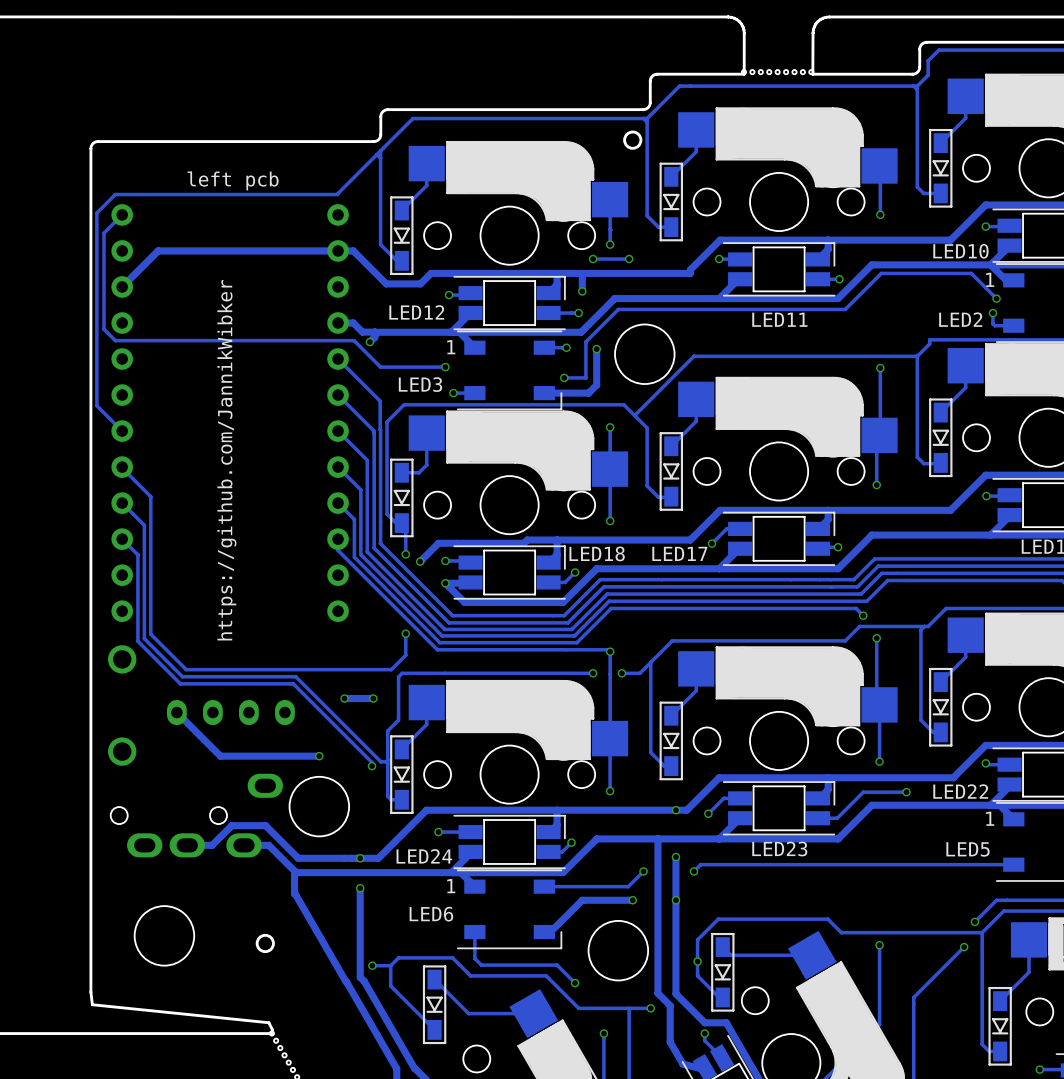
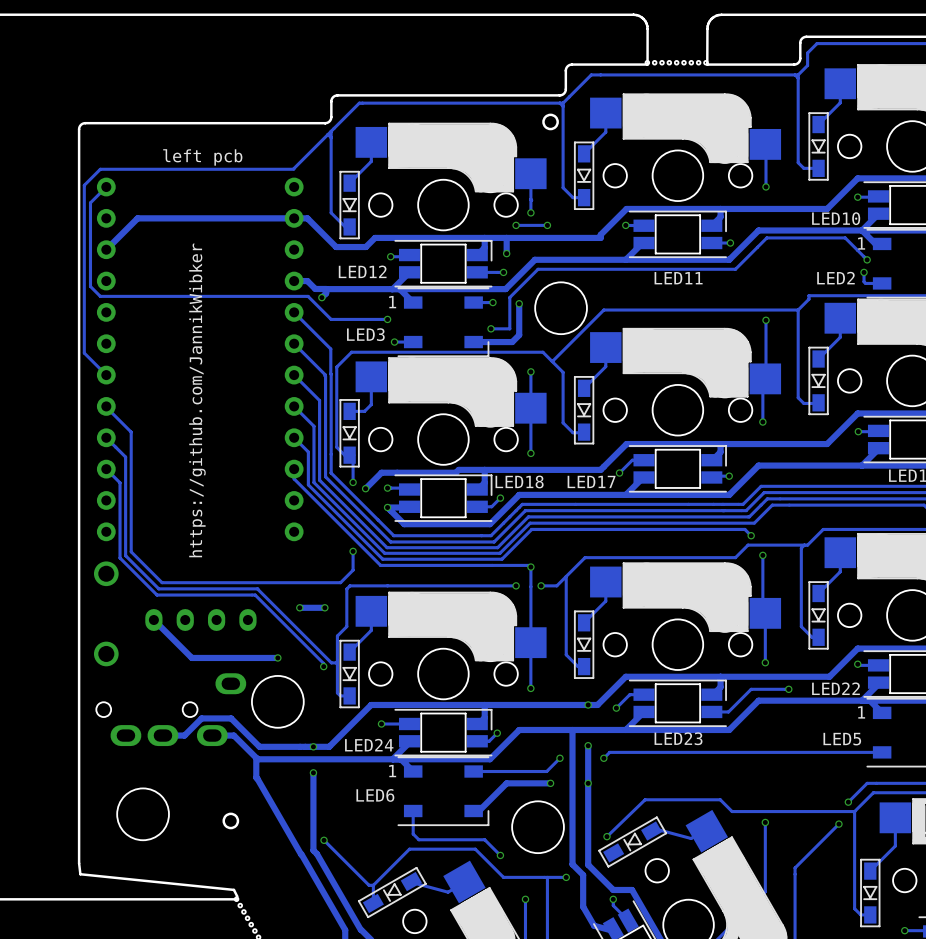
track: (741, 919) (718, 919) (697, 939) (697, 975) (719, 997) (722, 997) -> (645, 799) (606, 836)
track: (722, 947) (730, 955) (812, 955) -> none
track: none -> (653, 828) (691, 838) (708, 828)
track: (390, 965) (372, 965) -> (373, 885) (369, 885) (324, 840)
track: (390, 965) (398, 957) (452, 957) (470, 975) -> (373, 885) (409, 849)
track: (390, 965) (390, 986) (434, 1029) -> none
part rotation: 0° (722, 972) -> 60° clockwise (632, 842)
track: (434, 979) (468, 1013) (533, 1013) -> none
part: (434, 1004) -> none
track: none -> (411, 882) (448, 892) (464, 882)
track: none -> (373, 885) (373, 903)
part: none -> (392, 892)

